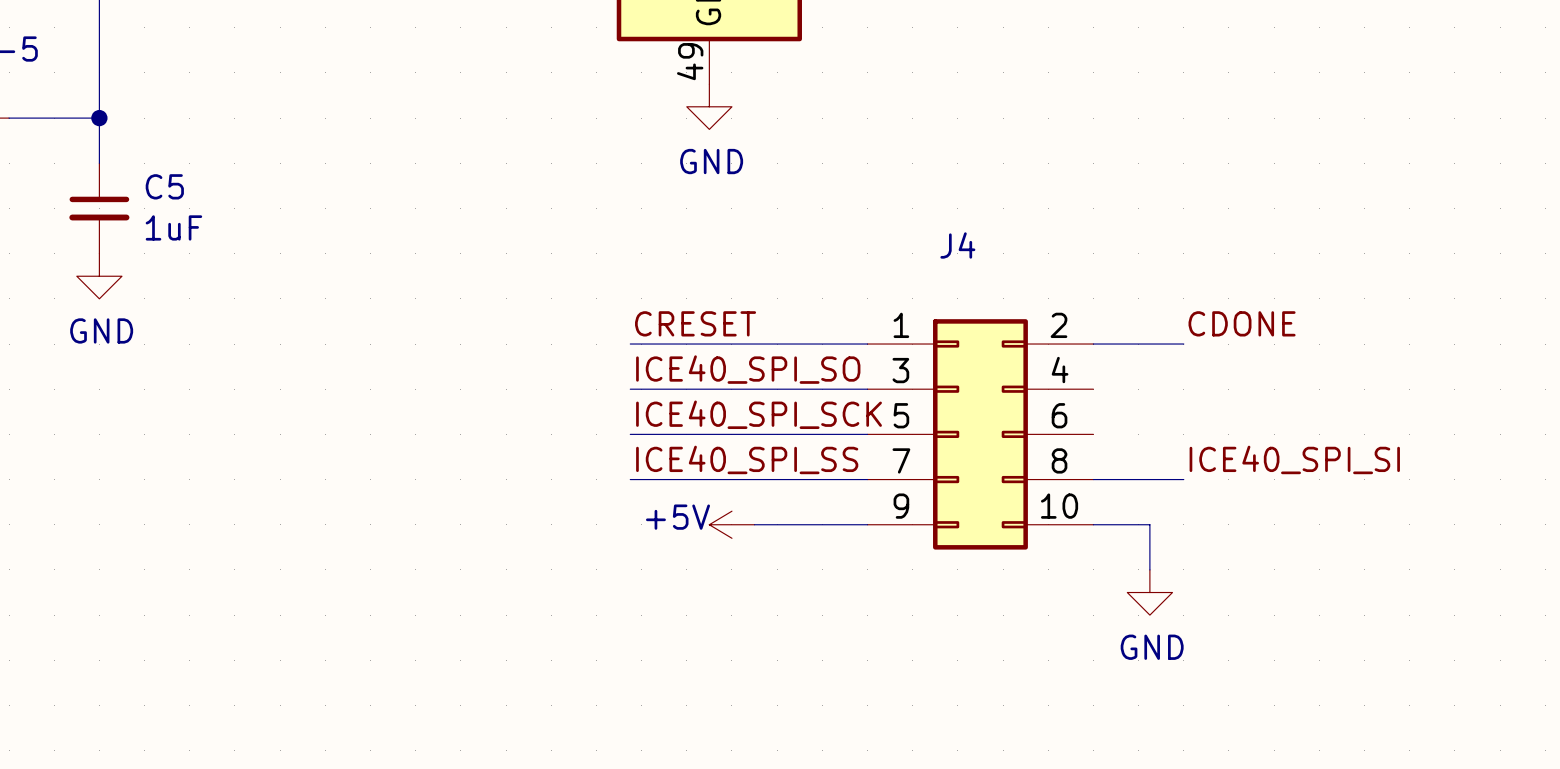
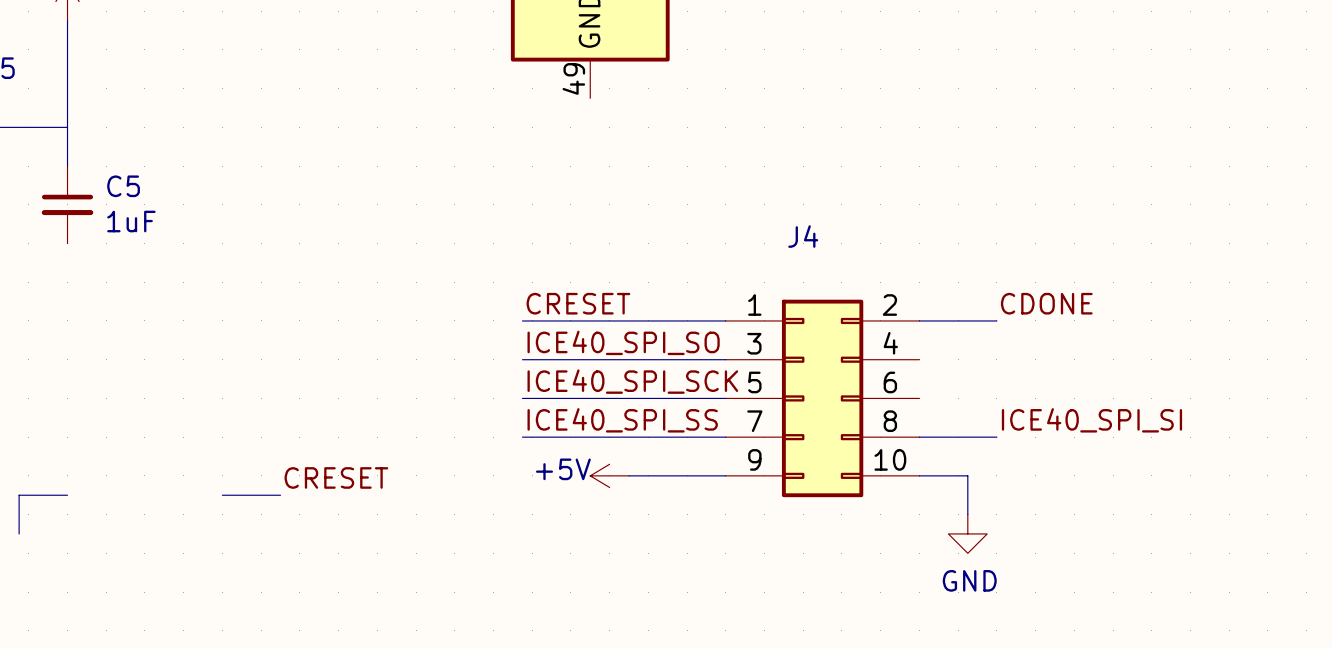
power symbol: GND (709, 106) -> none
junction: (99, 118) -> none
power symbol: GND (99, 276) -> none
label: none -> CRESET (336, 477)
wire: none -> (67, 495) (19, 495) (19, 533)
wire: none -> (222, 495) (280, 495)

